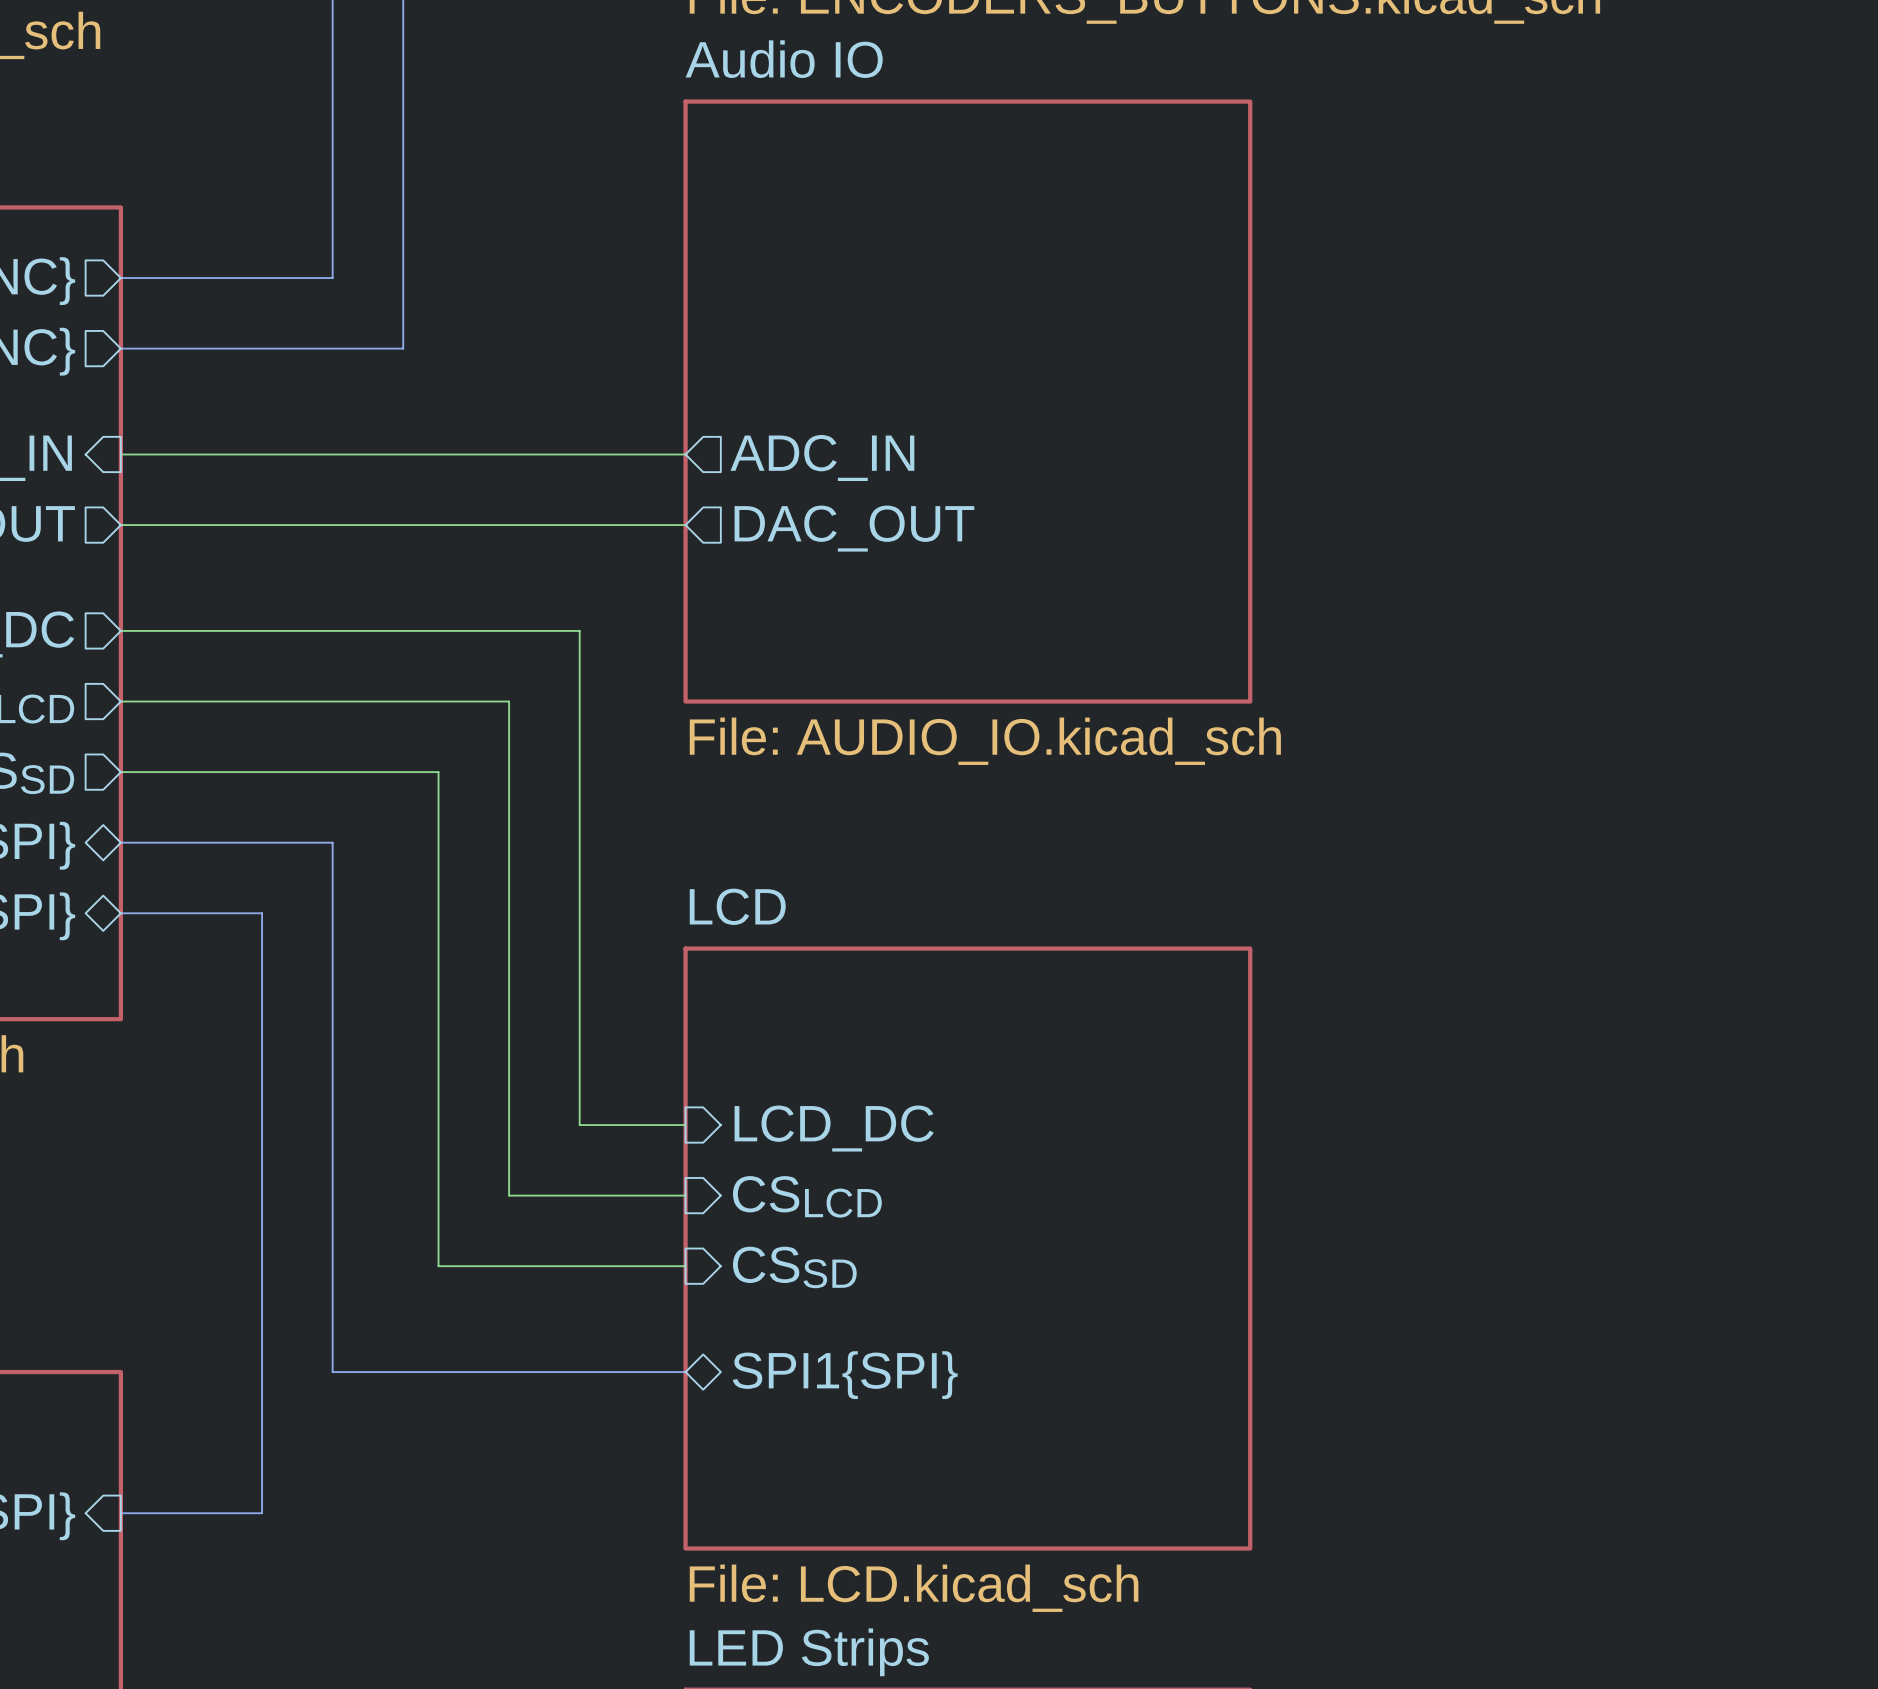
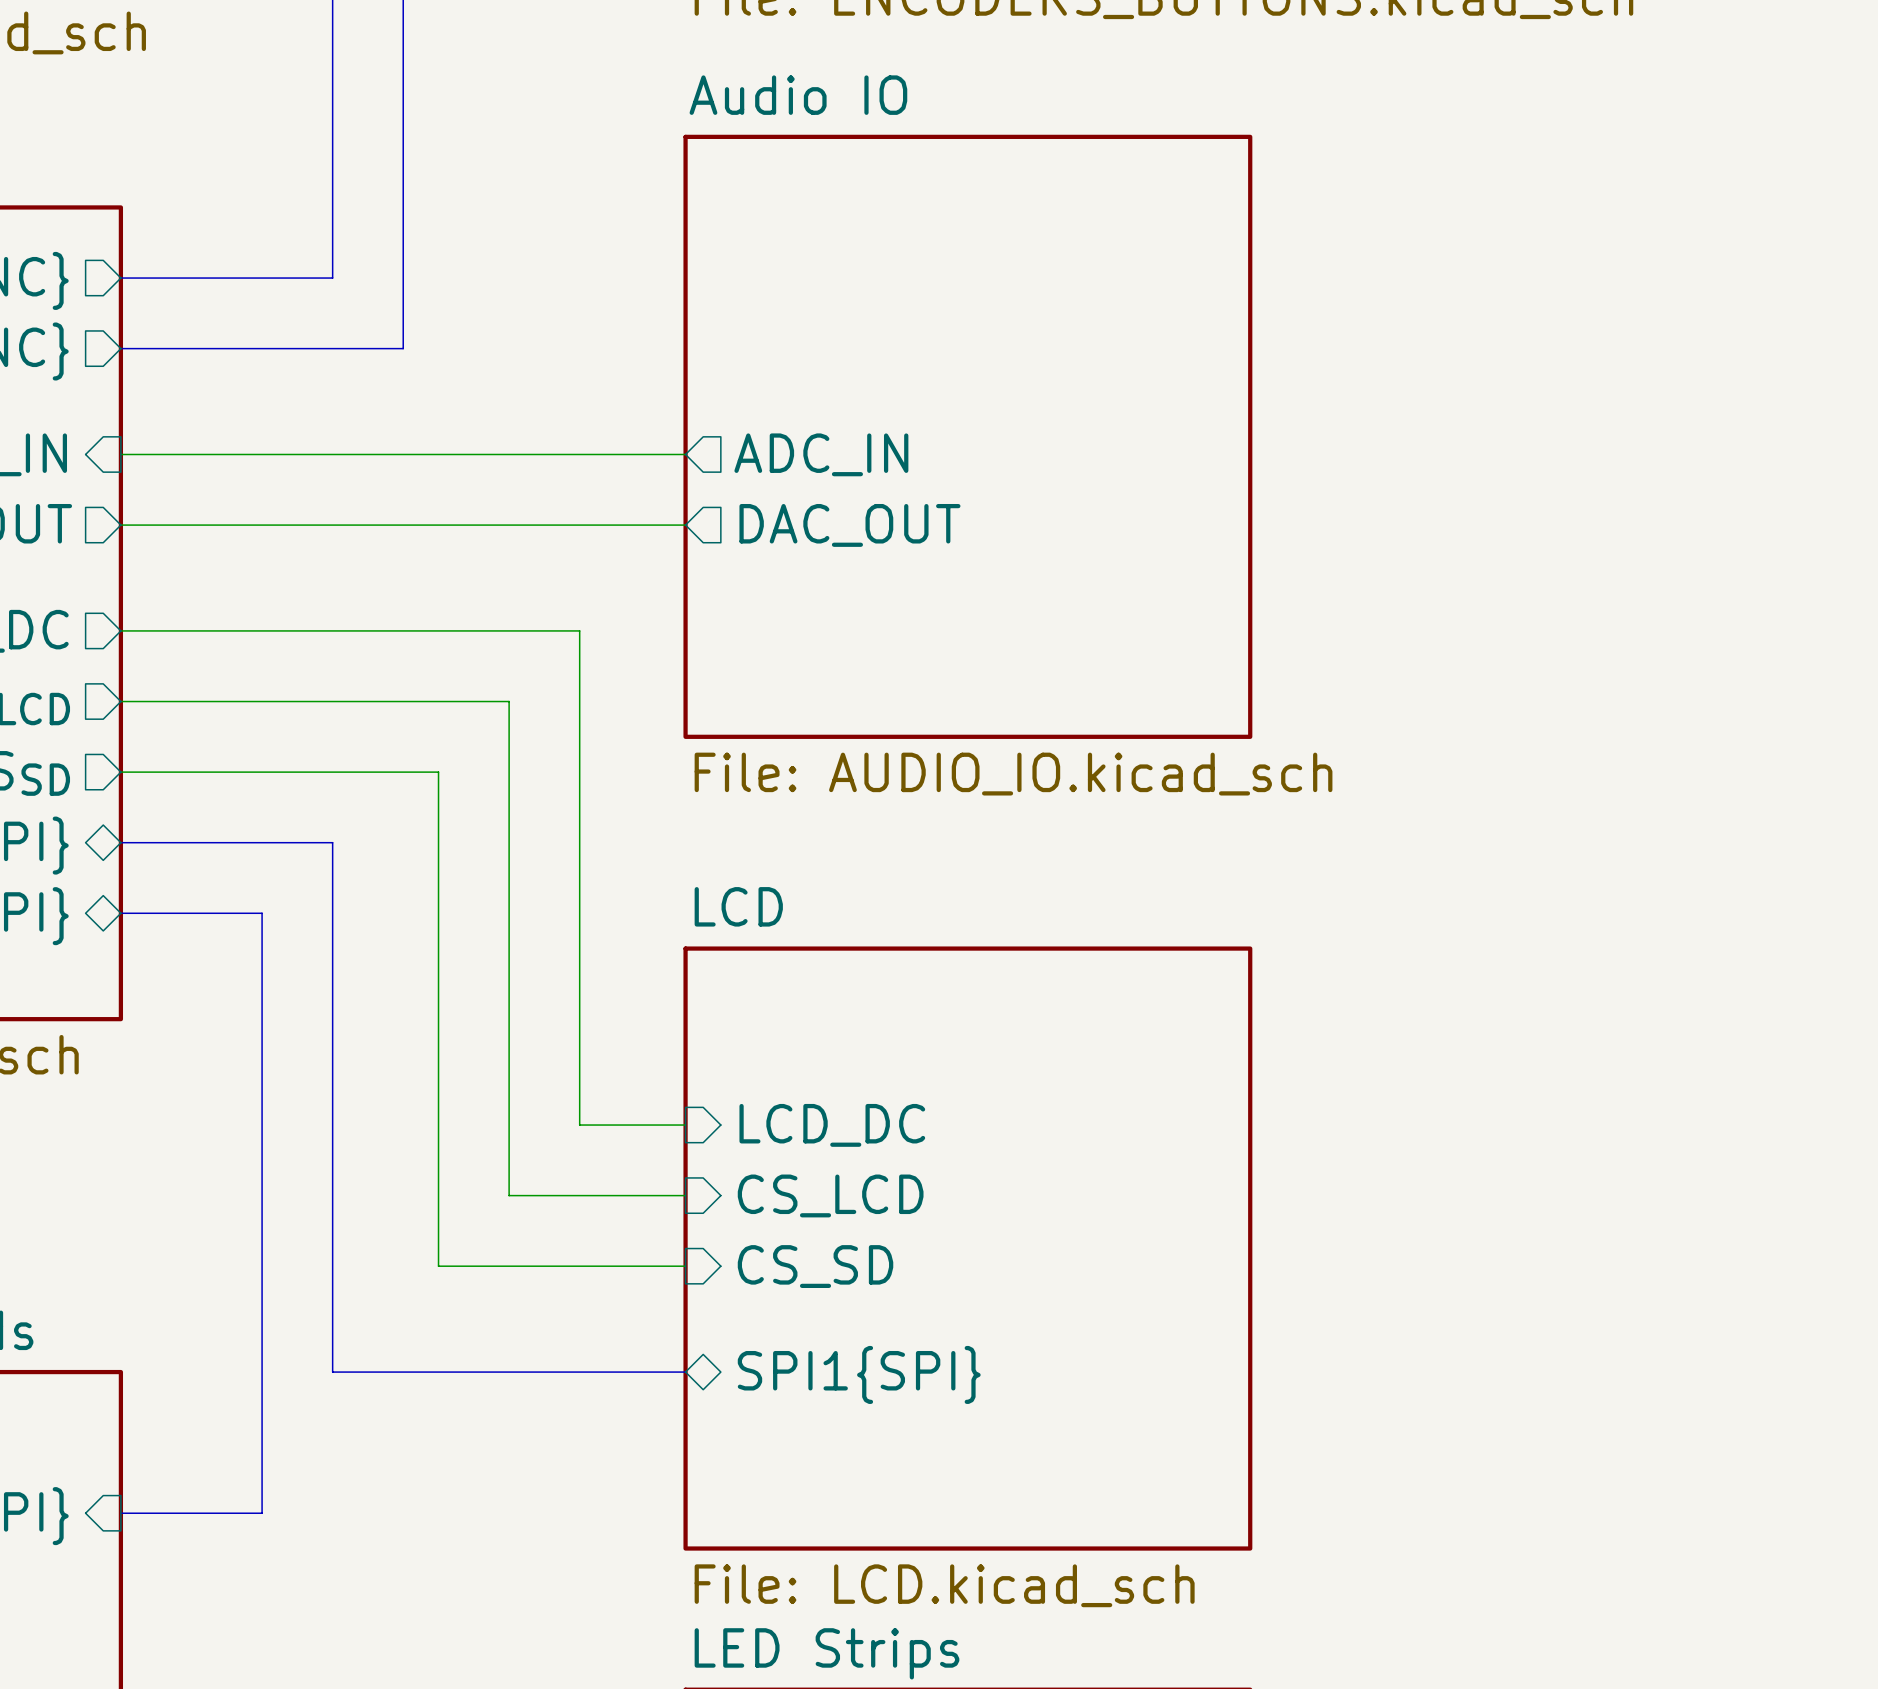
sheet Audio IO position: (967, 401) -> (967, 436)
sheet pin: CSLCD (807, 1196) -> CS_LCD (830, 1195)
sheet pin: CSSD (794, 1267) -> CS_SD (815, 1266)

